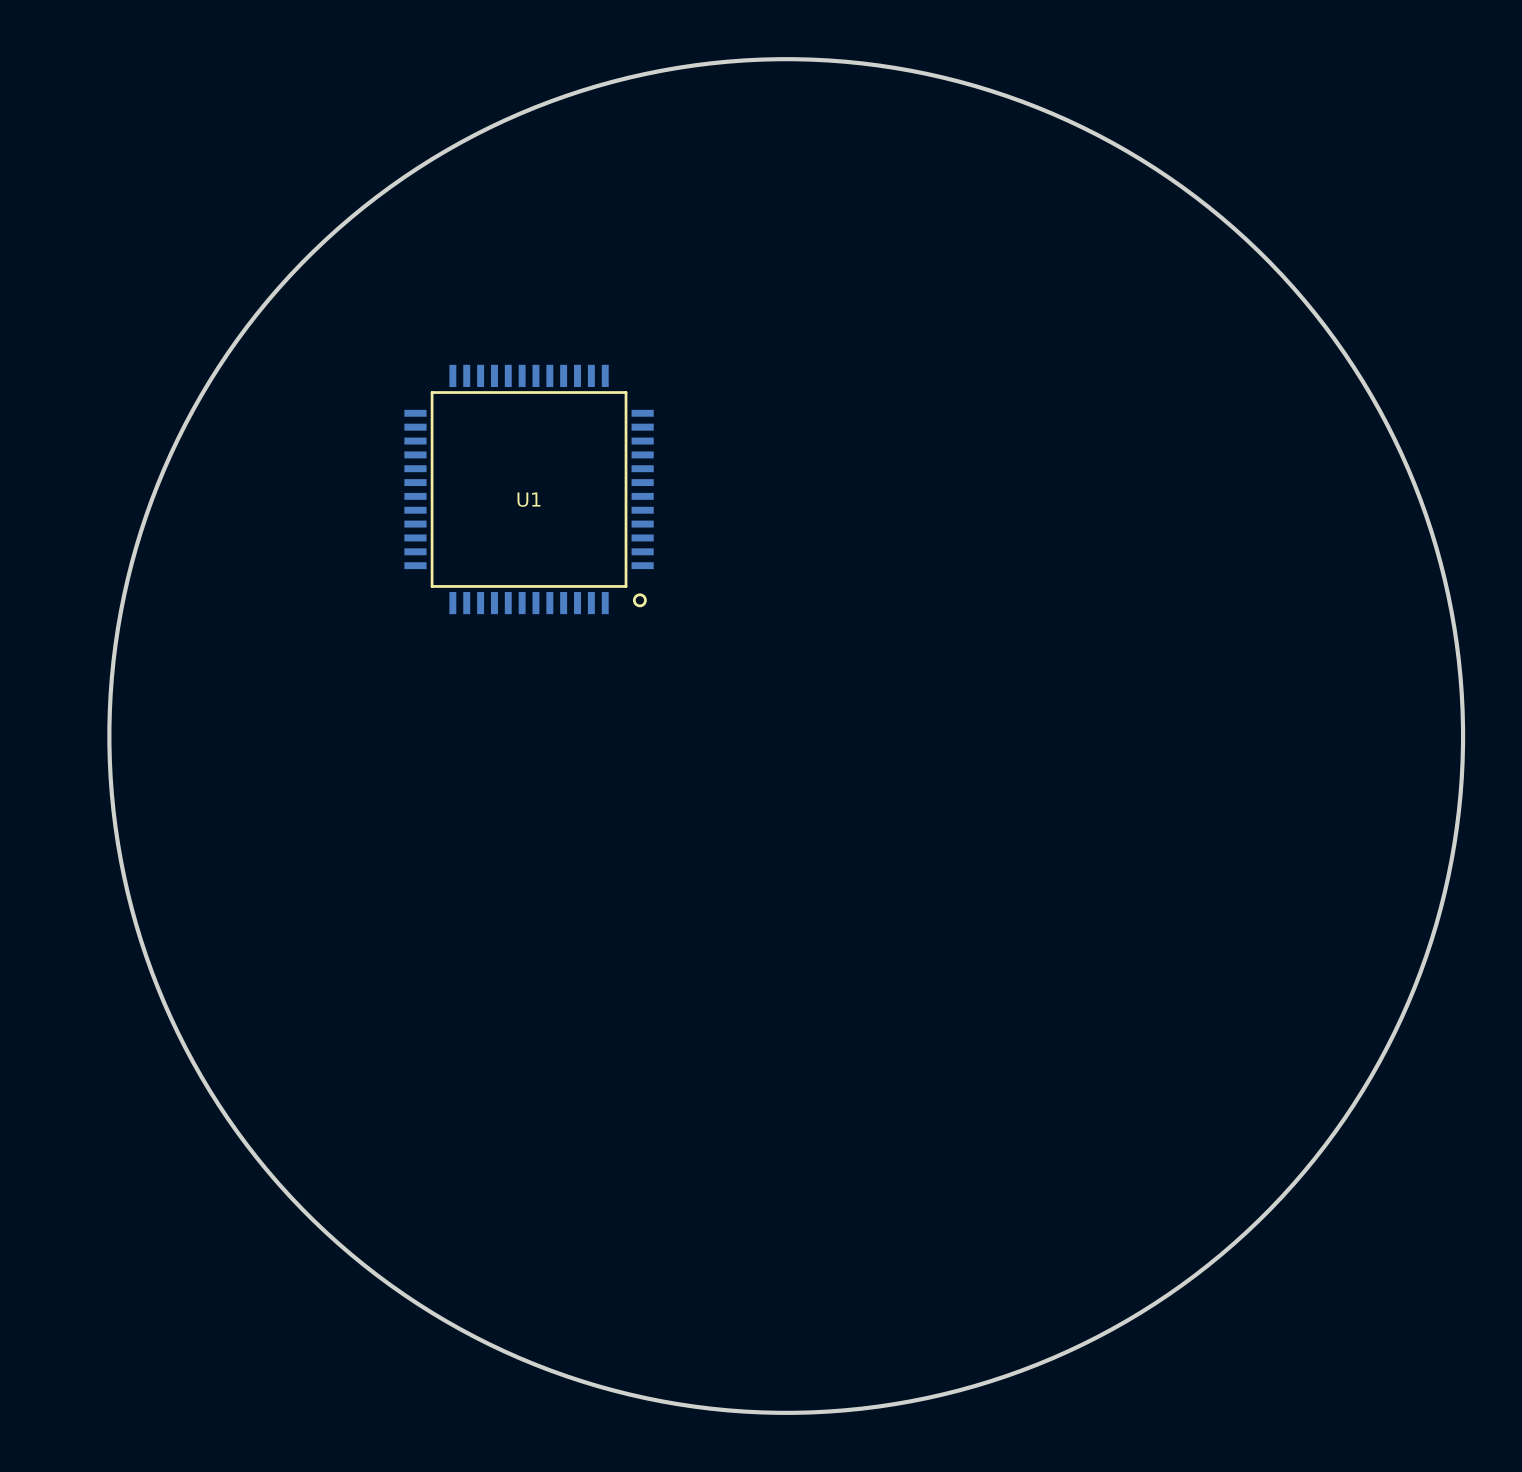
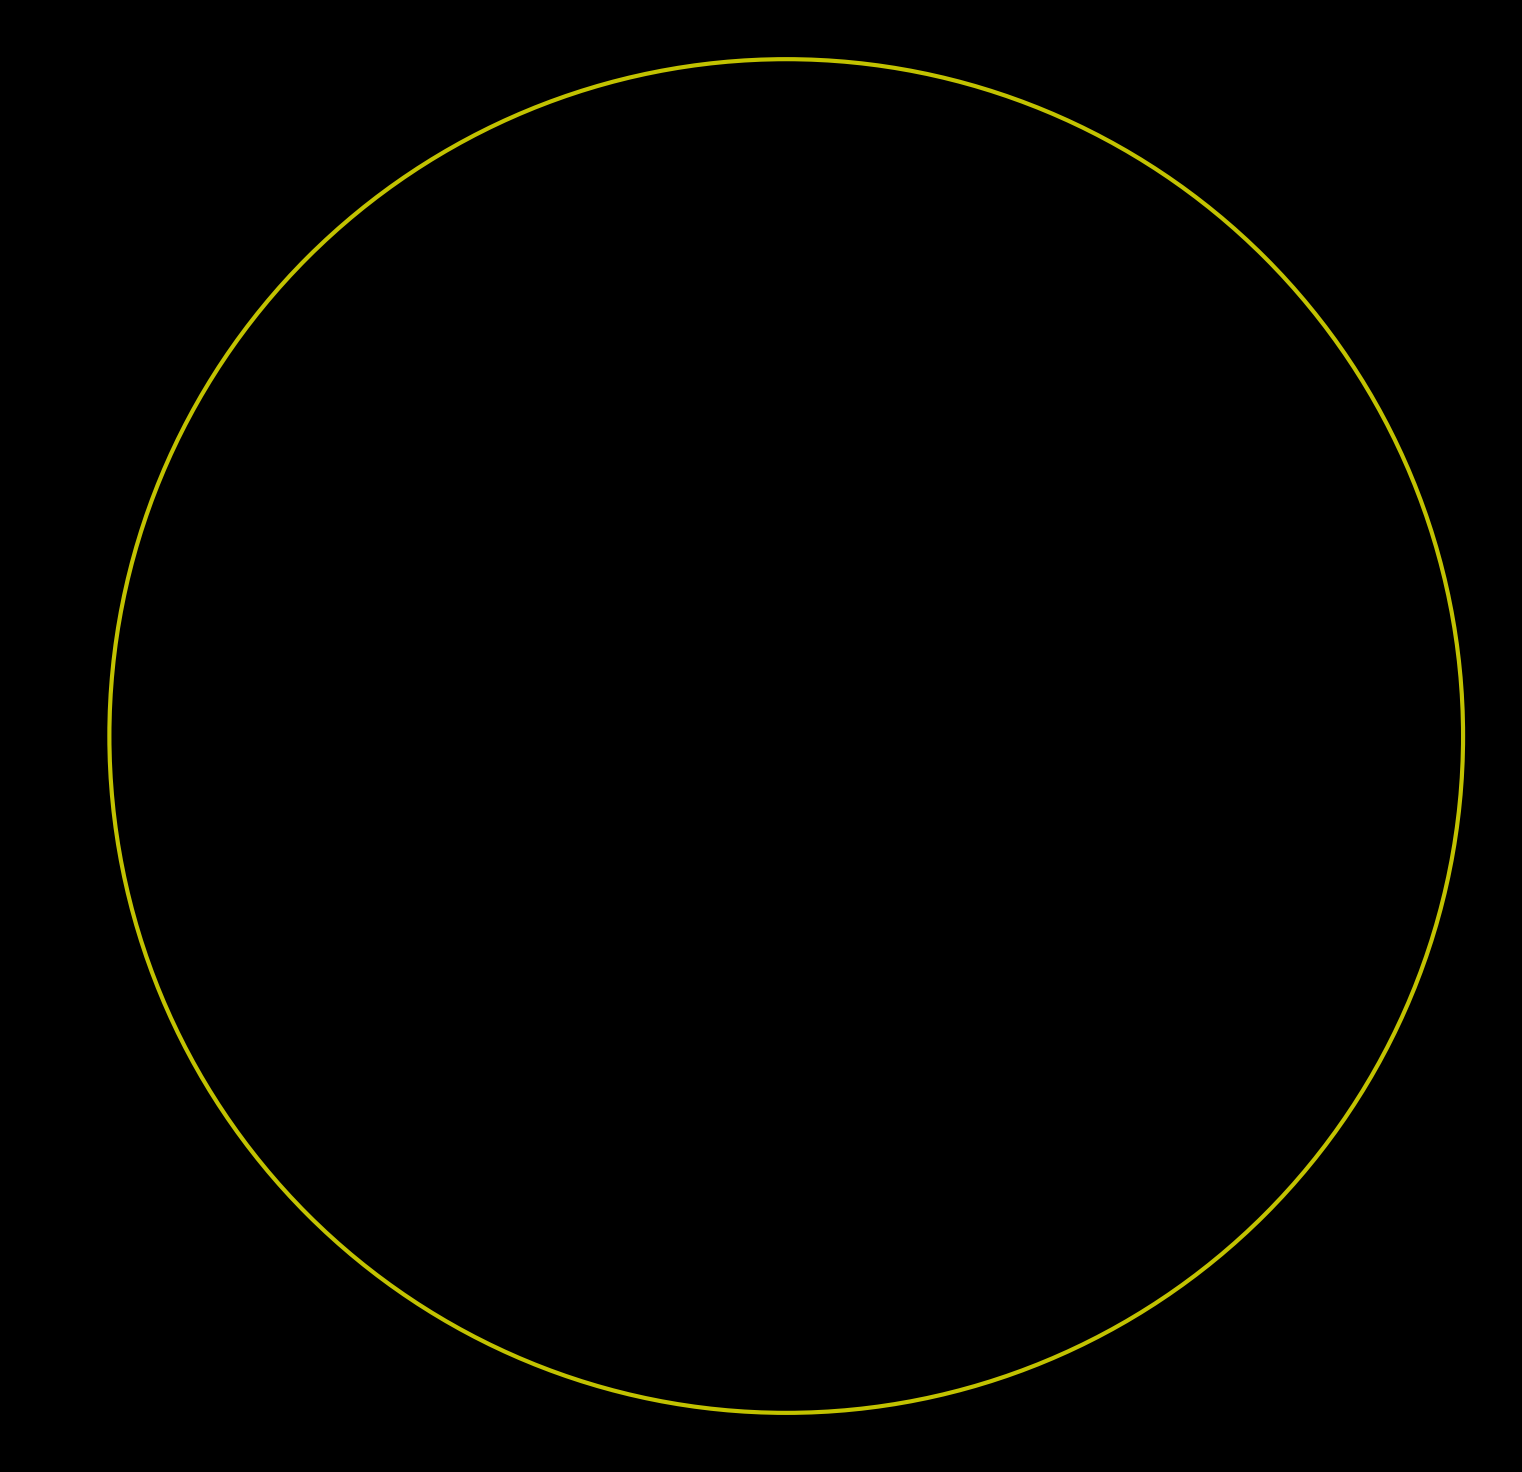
U1: (529, 489) -> none

